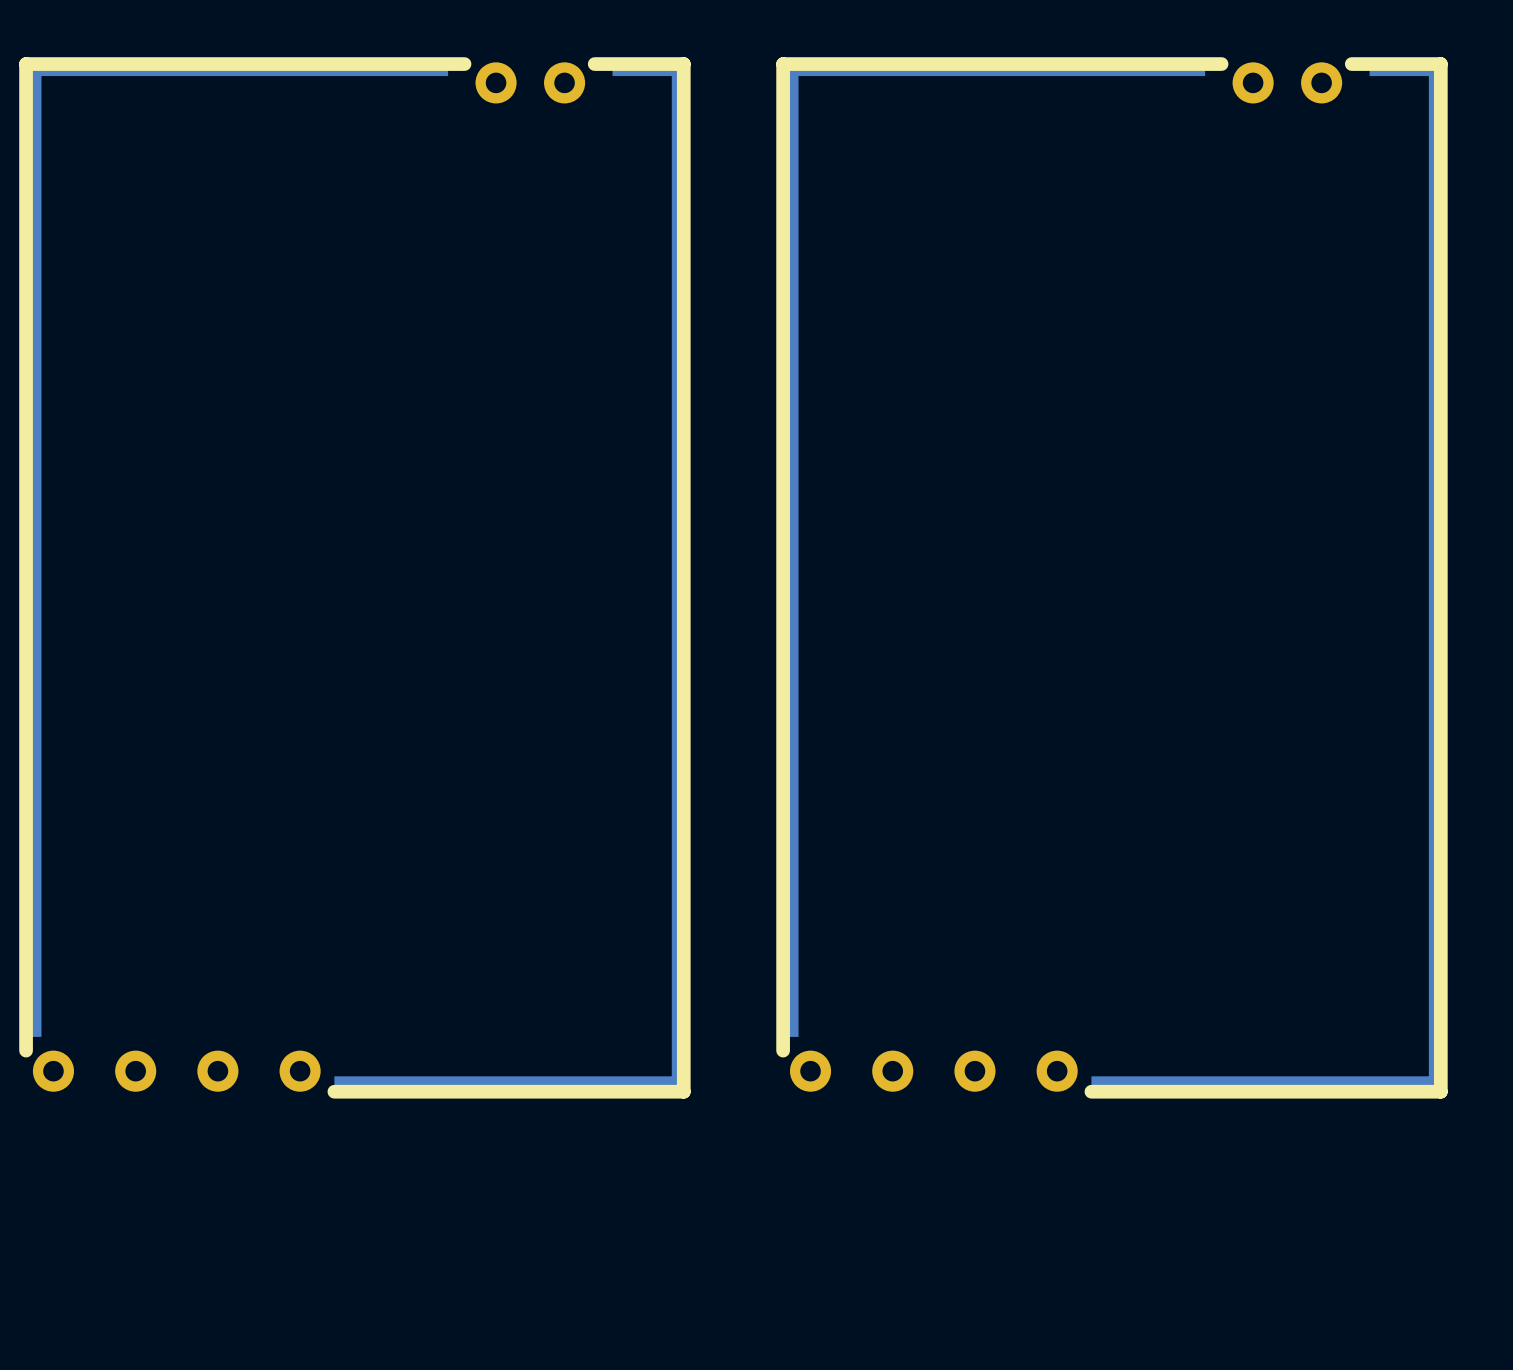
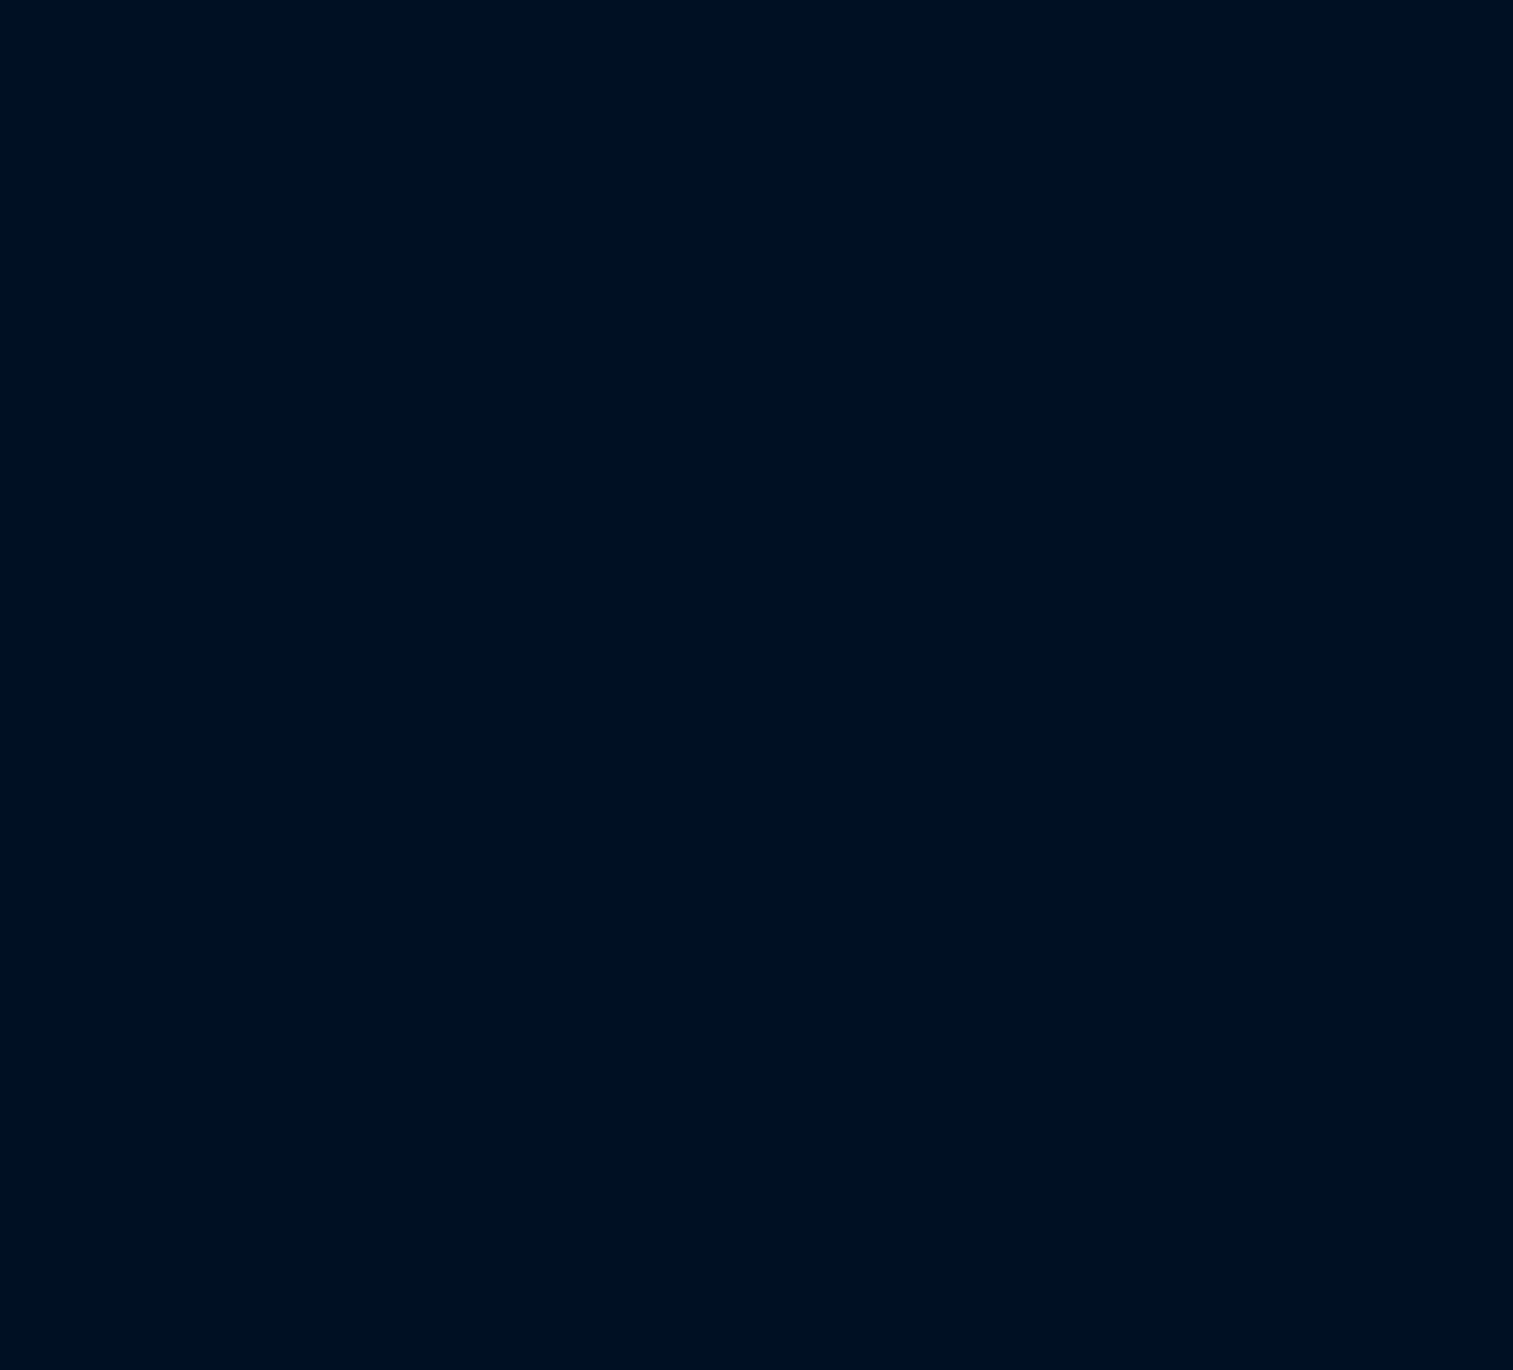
part: (354, 577) -> none
part: (1111, 577) -> none

